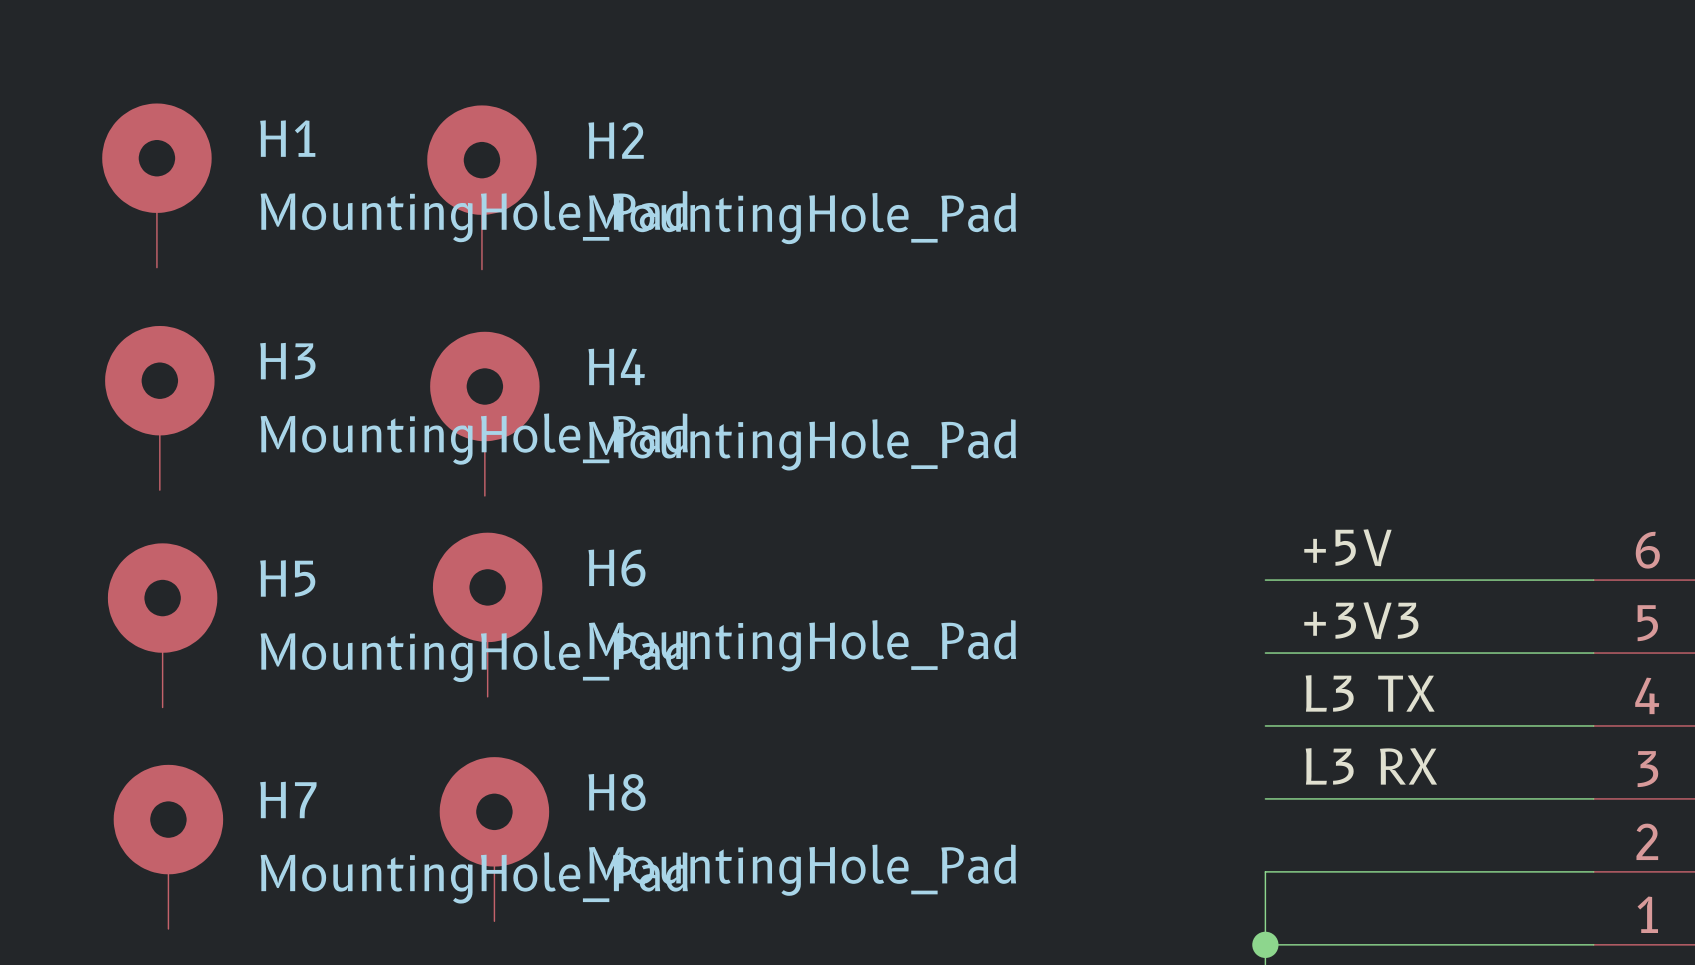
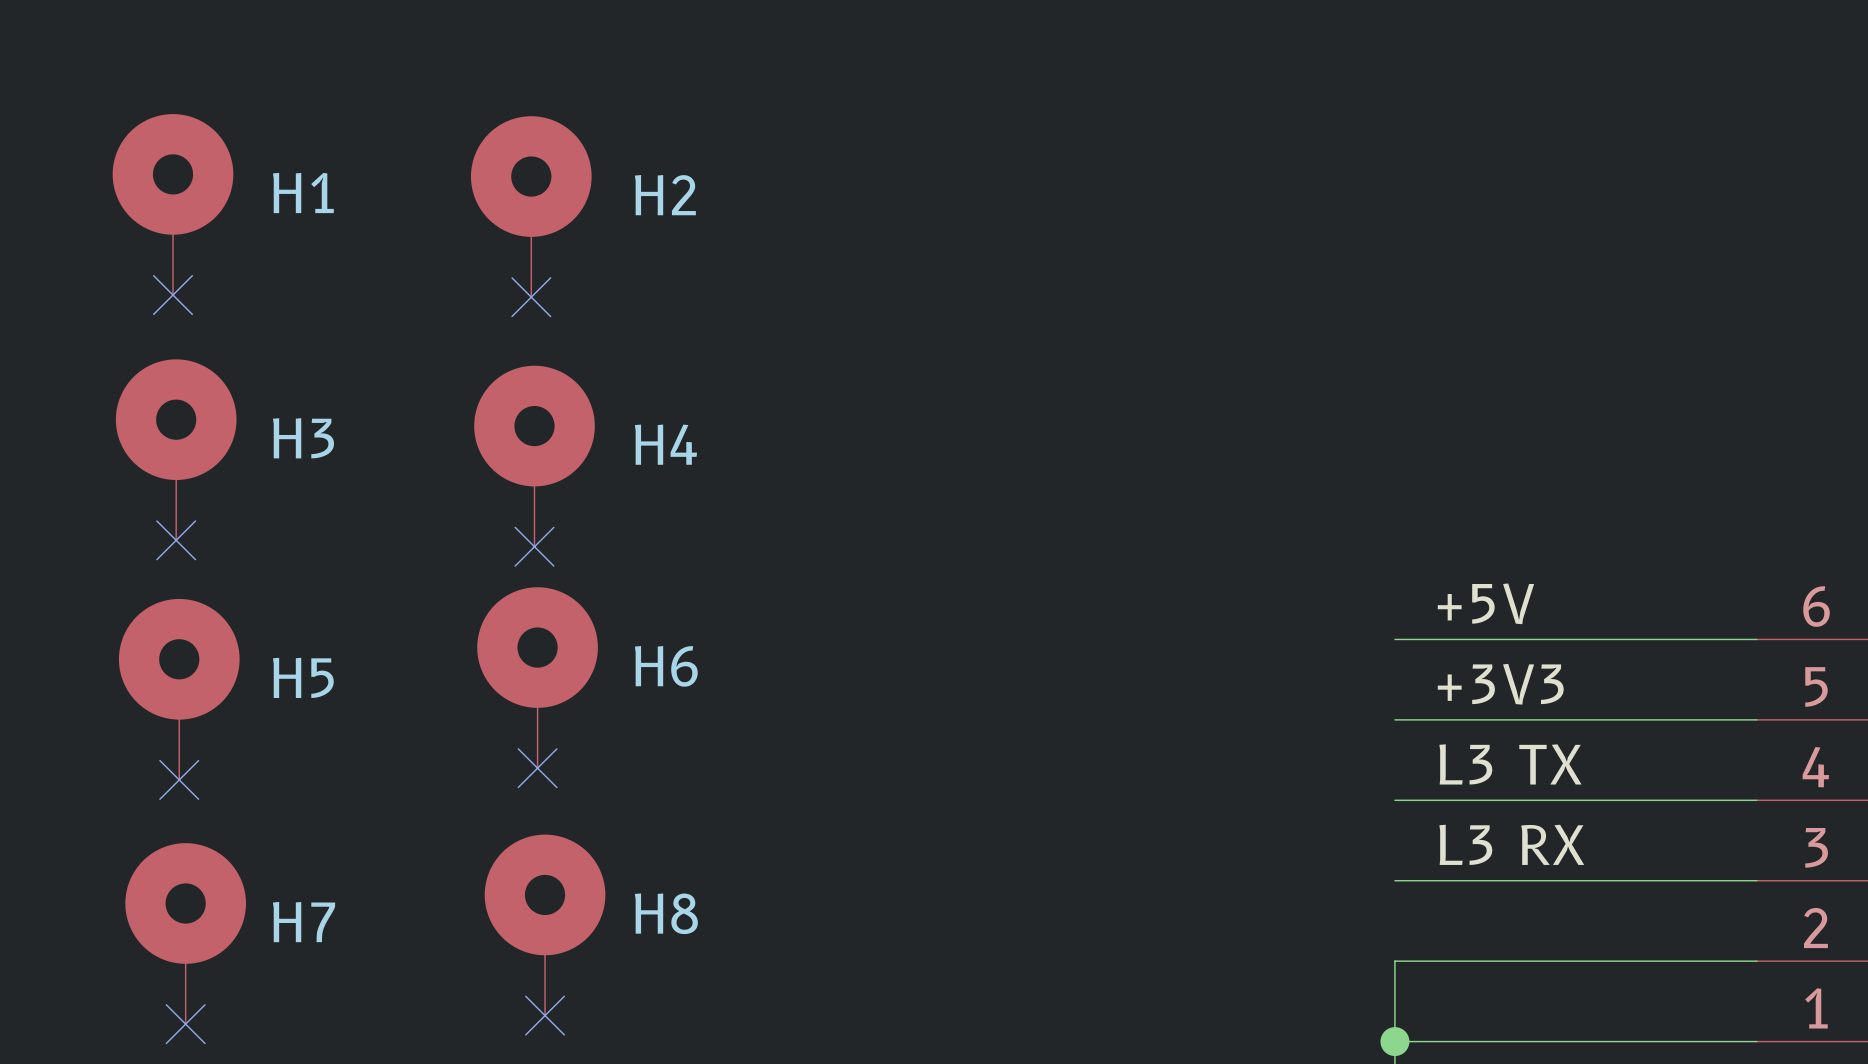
H1 name position: H1 (287, 138) -> H1 (303, 193)
H2 name position: H2 (616, 140) -> H2 (665, 195)
H1 value: MountingHole_Pad (474, 216) -> none
H2 value: MountingHole_Pad (802, 218) -> none
no-connect mark: none -> (173, 295)
no-connect mark: none -> (531, 297)
H3 name position: H3 (287, 361) -> H3 (303, 438)
H4 name position: H4 (616, 366) -> H4 (665, 444)
H3 value: MountingHole_Pad (474, 439) -> none
H4 value: MountingHole_Pad (802, 444) -> none
no-connect mark: none -> (176, 540)
no-connect mark: none -> (534, 546)
H6 name position: H6 (616, 568) -> H6 (666, 666)
H5 name position: H5 (287, 578) -> H5 (303, 677)
H6 value: MountingHole_Pad (802, 645) -> none
H5 value: MountingHole_Pad (474, 656) -> none
no-connect mark: none -> (537, 768)
no-connect mark: none -> (179, 779)
H8 name position: H8 (617, 792) -> H8 (666, 913)
H7 name position: H7 (288, 799) -> H7 (304, 922)
H8 value: MountingHole_Pad (802, 870) -> none
H7 value: MountingHole_Pad (474, 877) -> none
no-connect mark: none -> (545, 1015)
no-connect mark: none -> (185, 1024)

